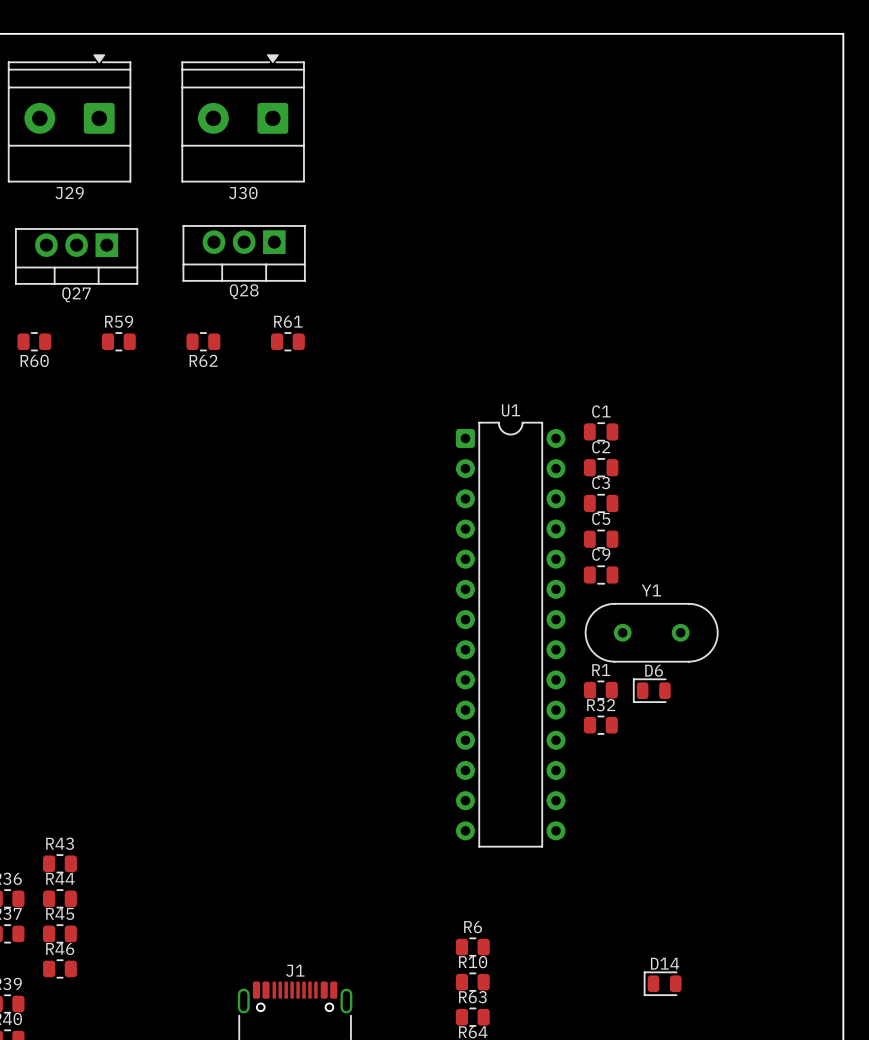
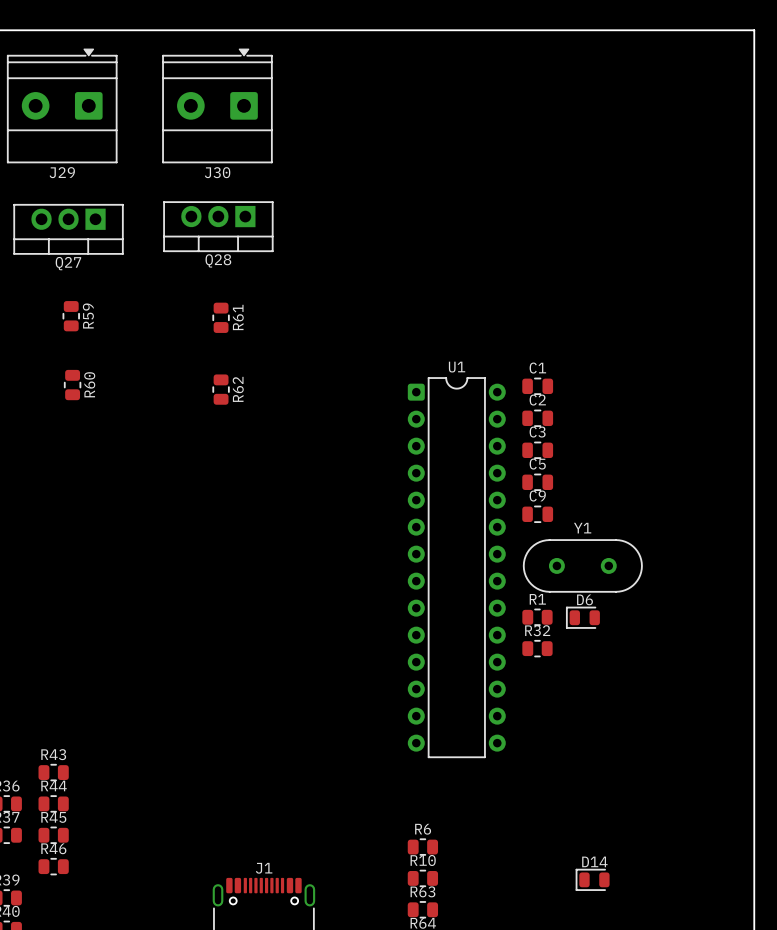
R60 rotation: 0° (34, 341) -> 90° clockwise (72, 385)
R60 position: (34, 341) -> (72, 385)
R59 rotation: 0° (118, 341) -> 90° clockwise (71, 316)
R59 position: (118, 341) -> (71, 316)
R62 rotation: 0° (203, 341) -> 90° clockwise (221, 389)
R62 position: (203, 341) -> (221, 389)
R61 rotation: 0° (287, 341) -> 90° clockwise (221, 317)
R61 position: (287, 341) -> (221, 317)
R60 name position: R60 (34, 360) -> R60 (89, 384)
R62 name position: R62 (203, 360) -> R62 (238, 389)

